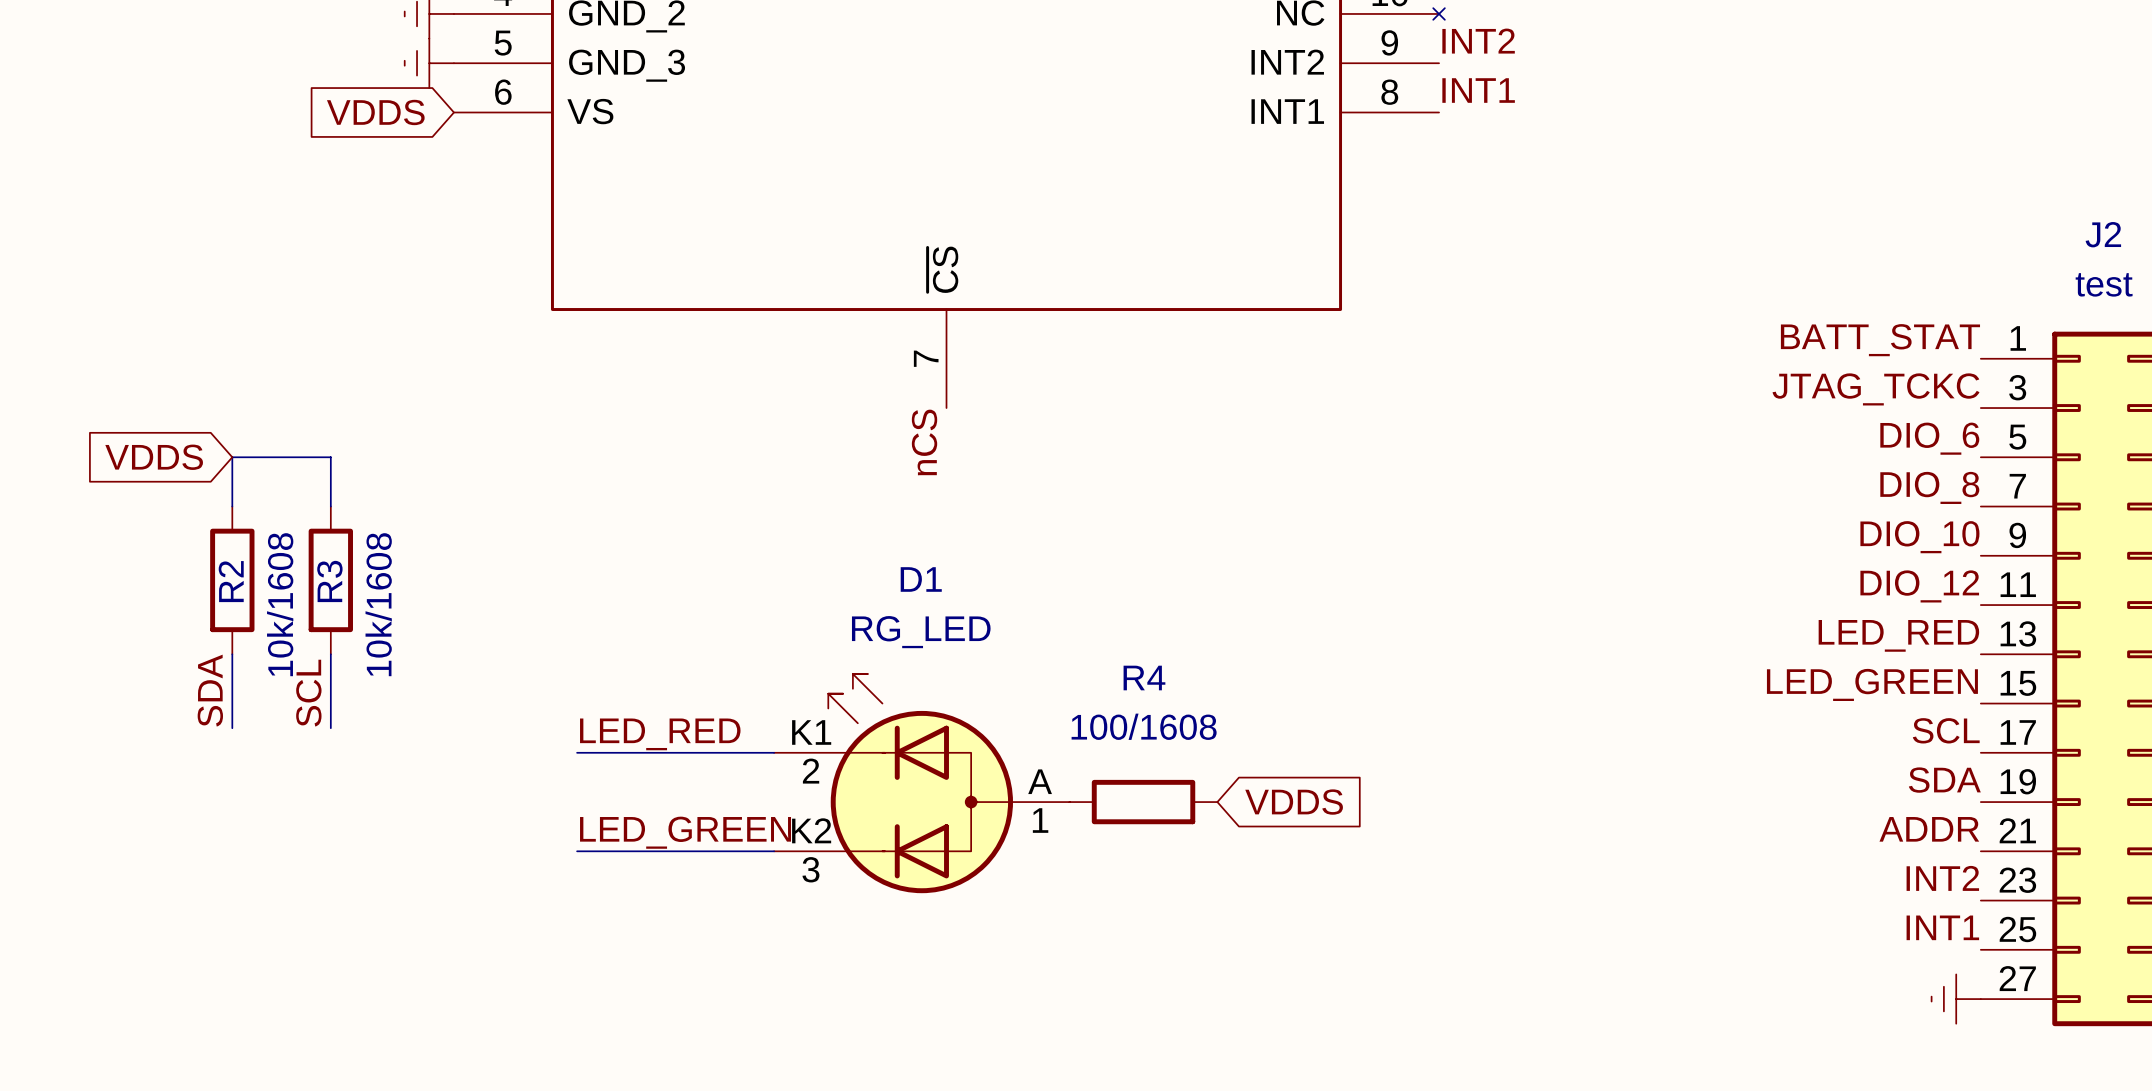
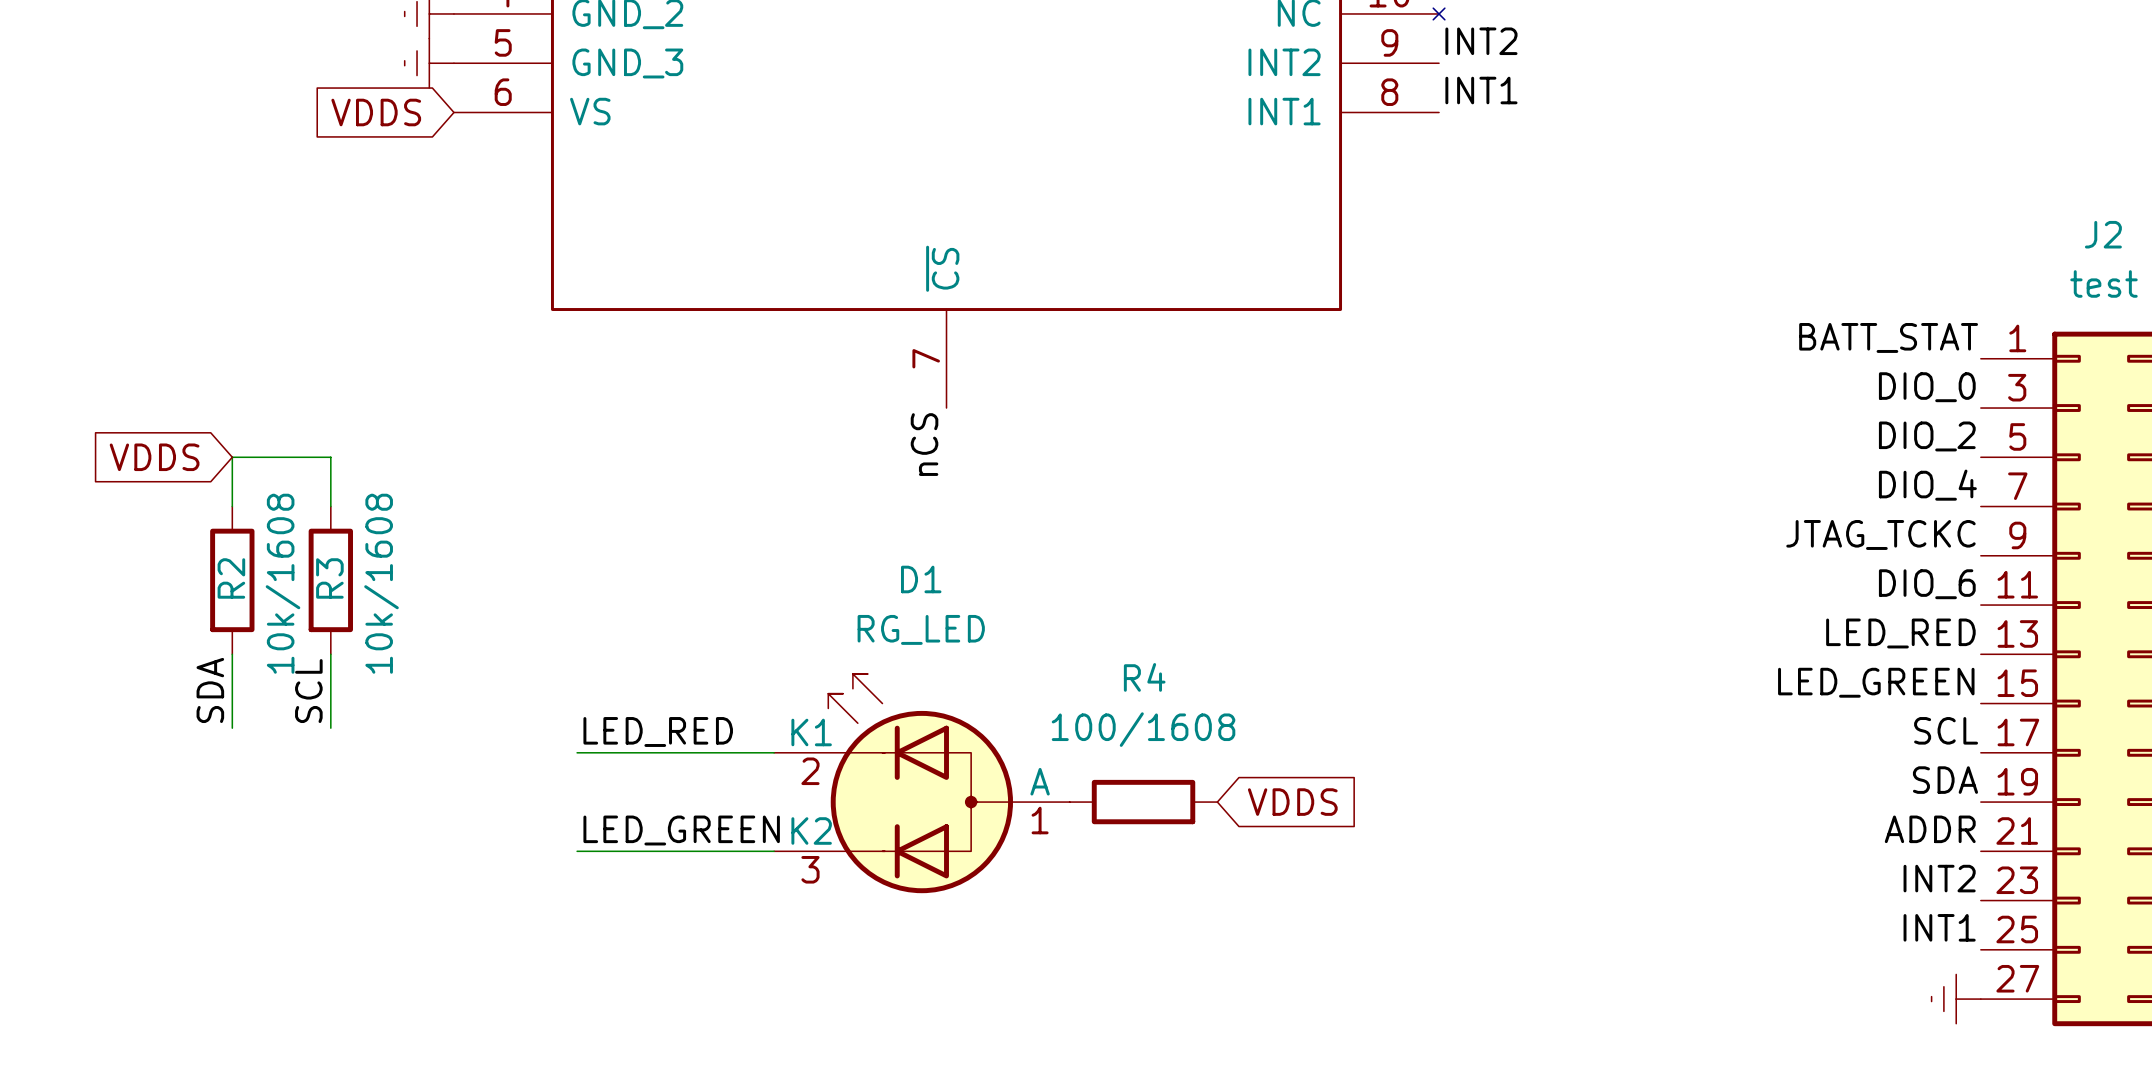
label: JTAG_TCKC (1876, 389) -> DIO_0 (1927, 387)
label: DIO_6 (1929, 438) -> DIO_2 (1927, 436)
label: DIO_8 (1929, 487) -> DIO_4 (1927, 485)
label: DIO_10 (1919, 537) -> JTAG_TCKC (1880, 534)
label: DIO_12 (1919, 586) -> DIO_6 (1927, 584)

